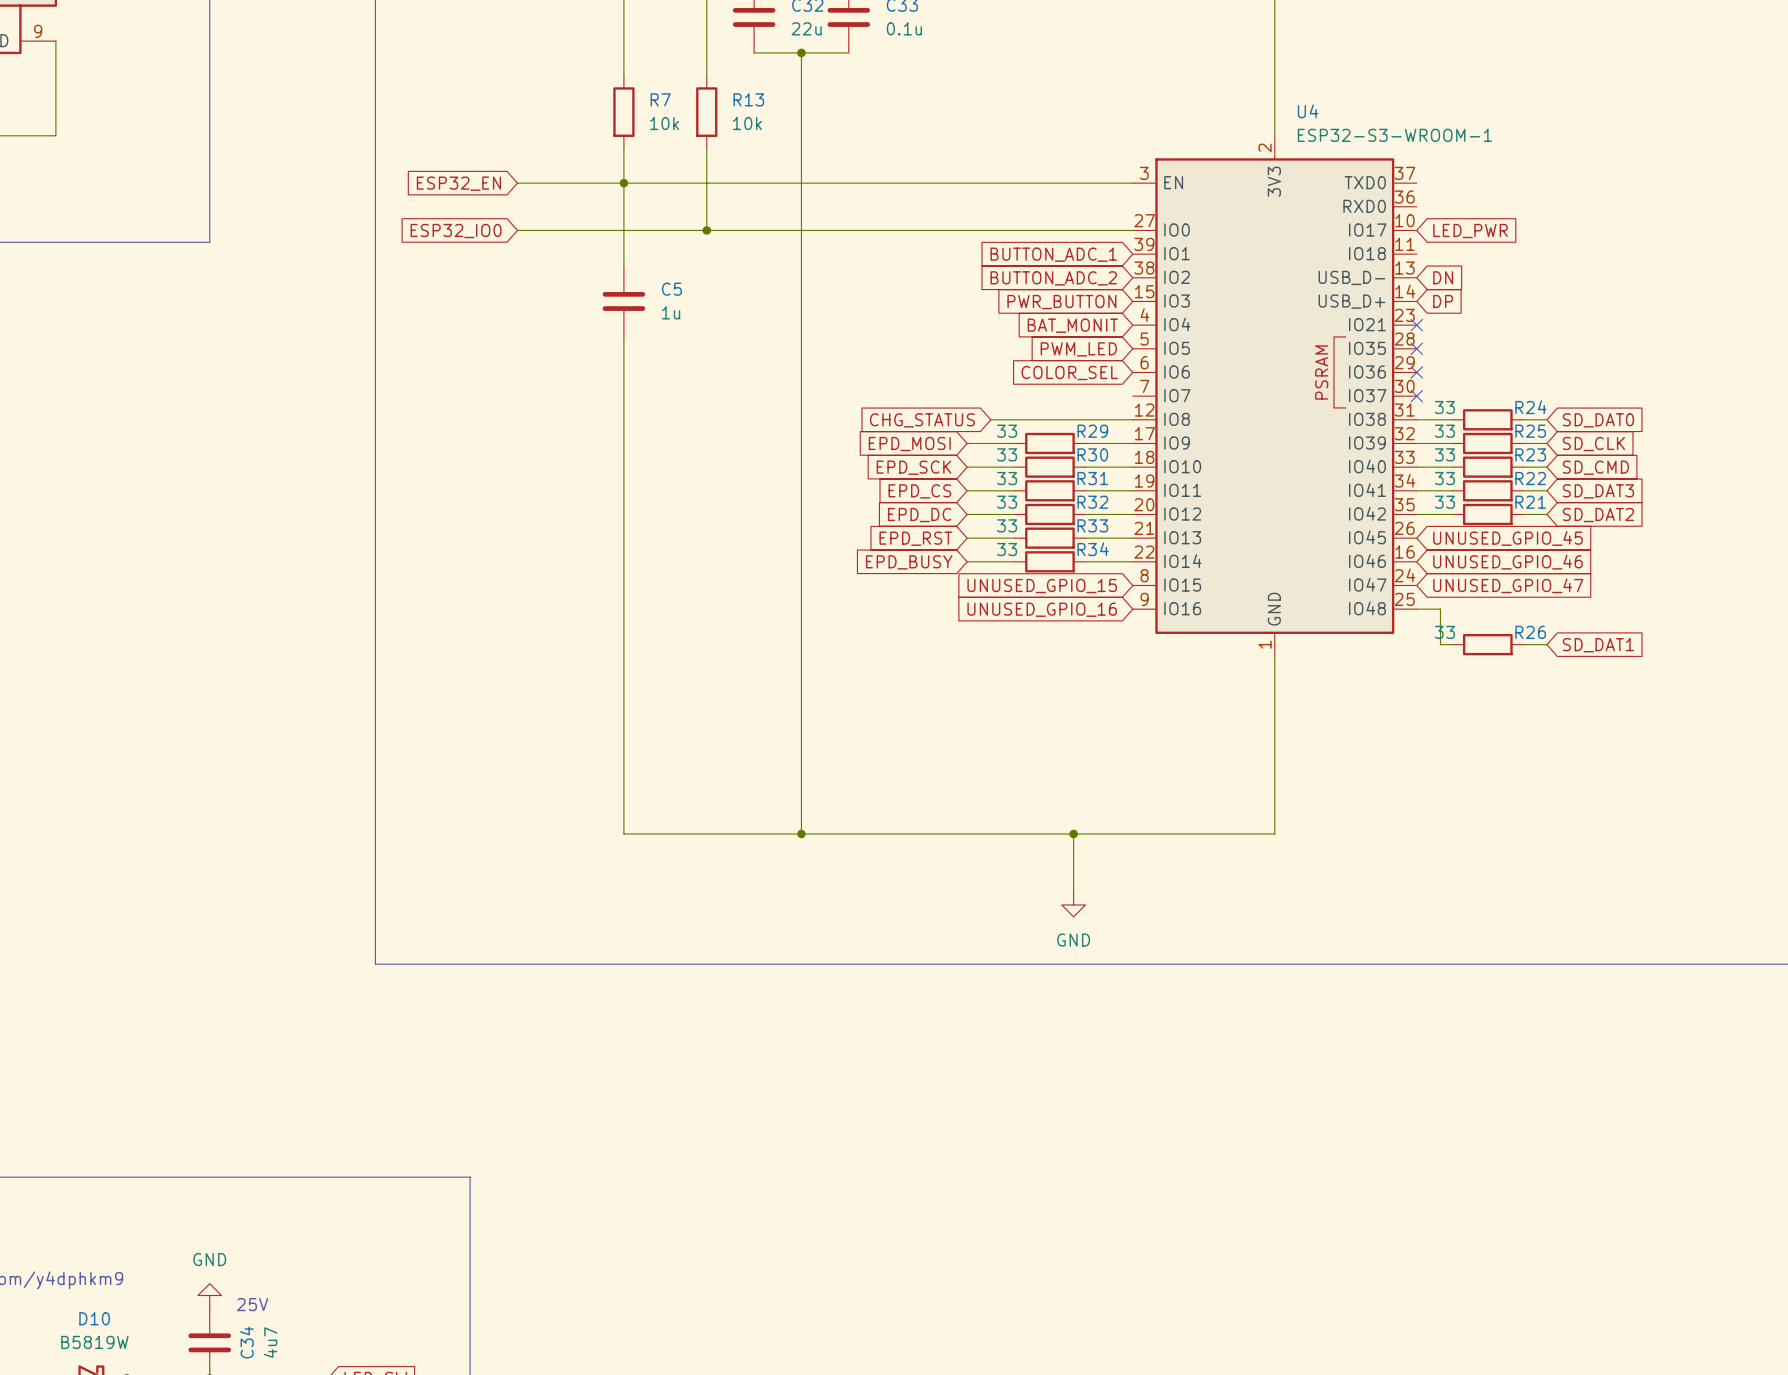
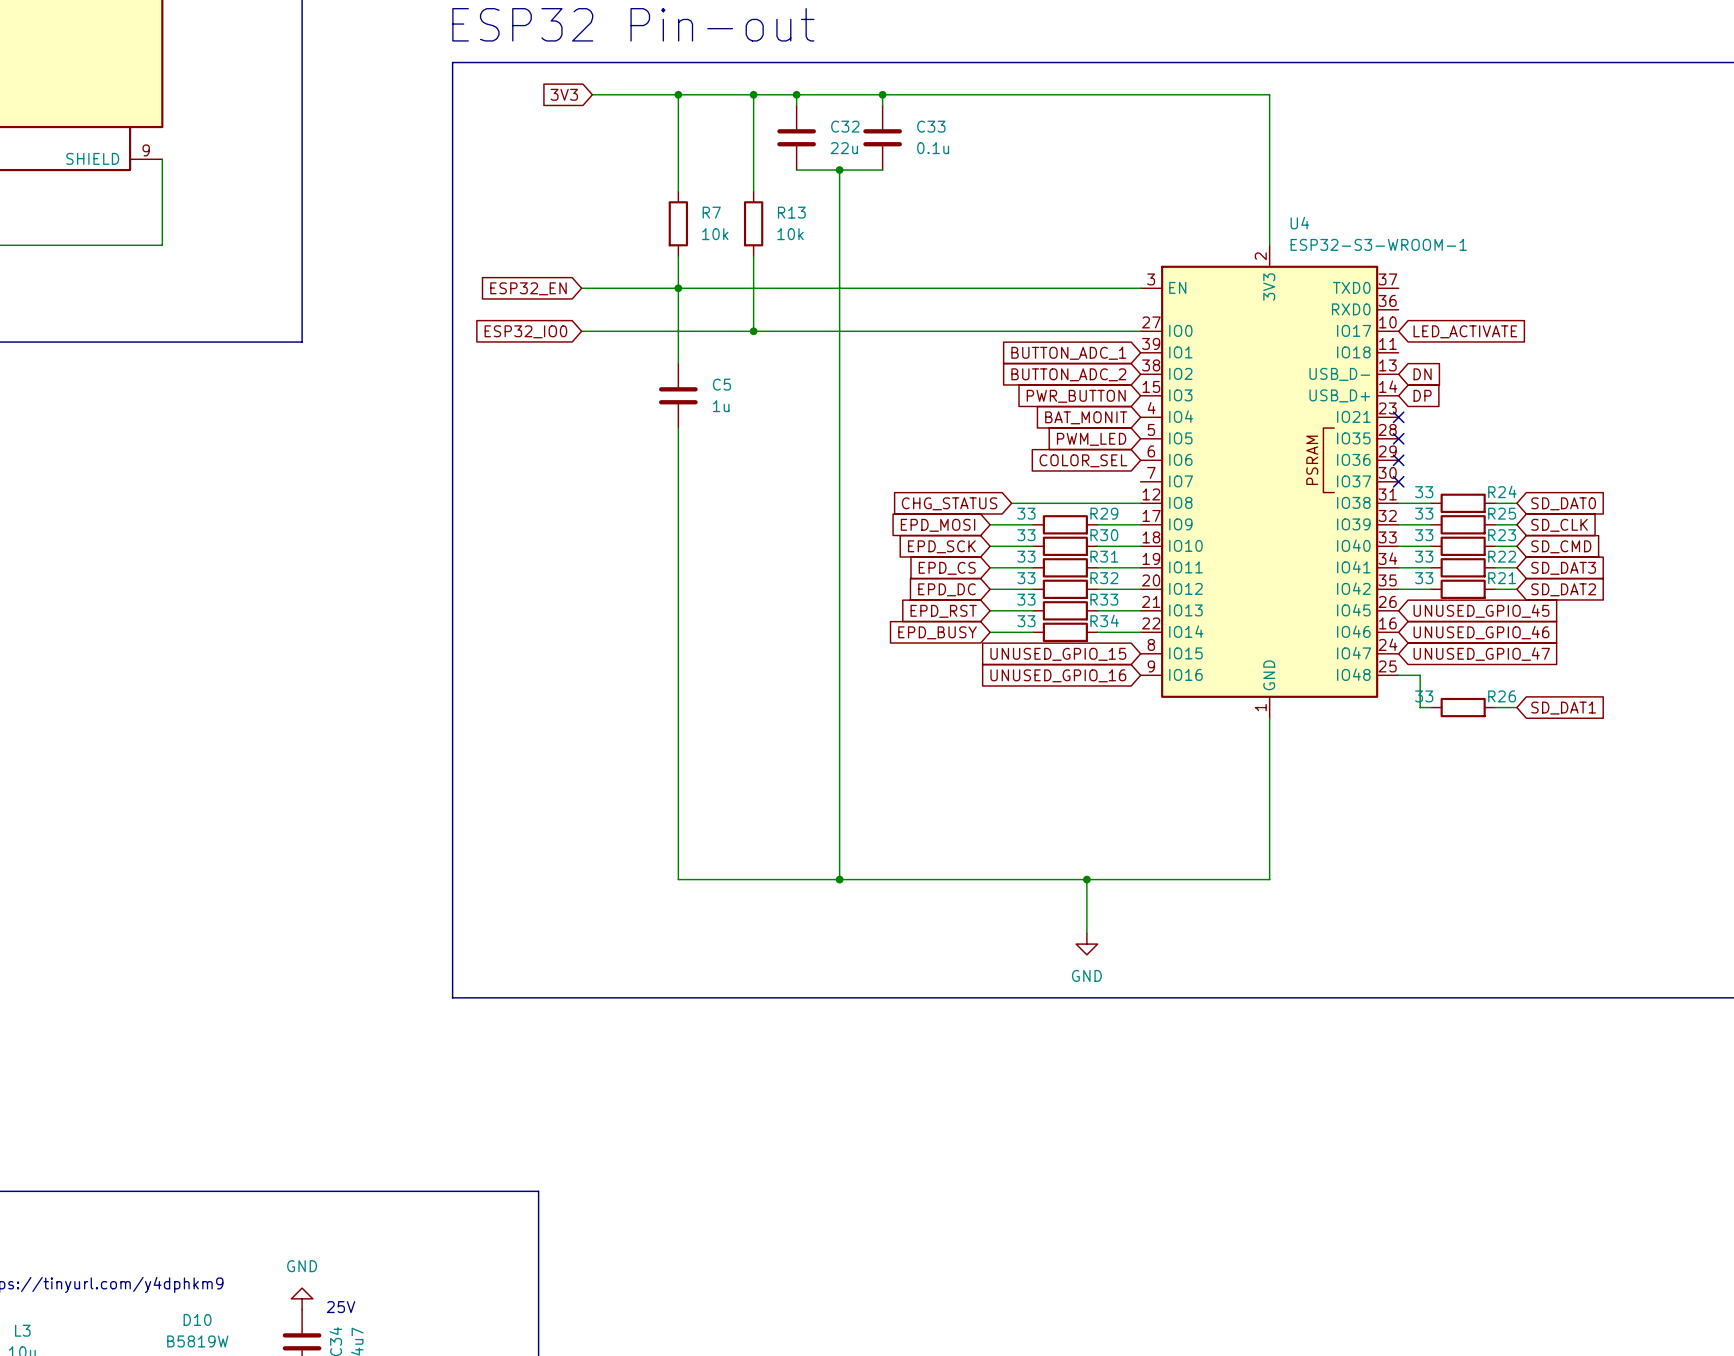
global label: LED_PWR (1470, 231) -> LED_ACTIVATE (1465, 331)

